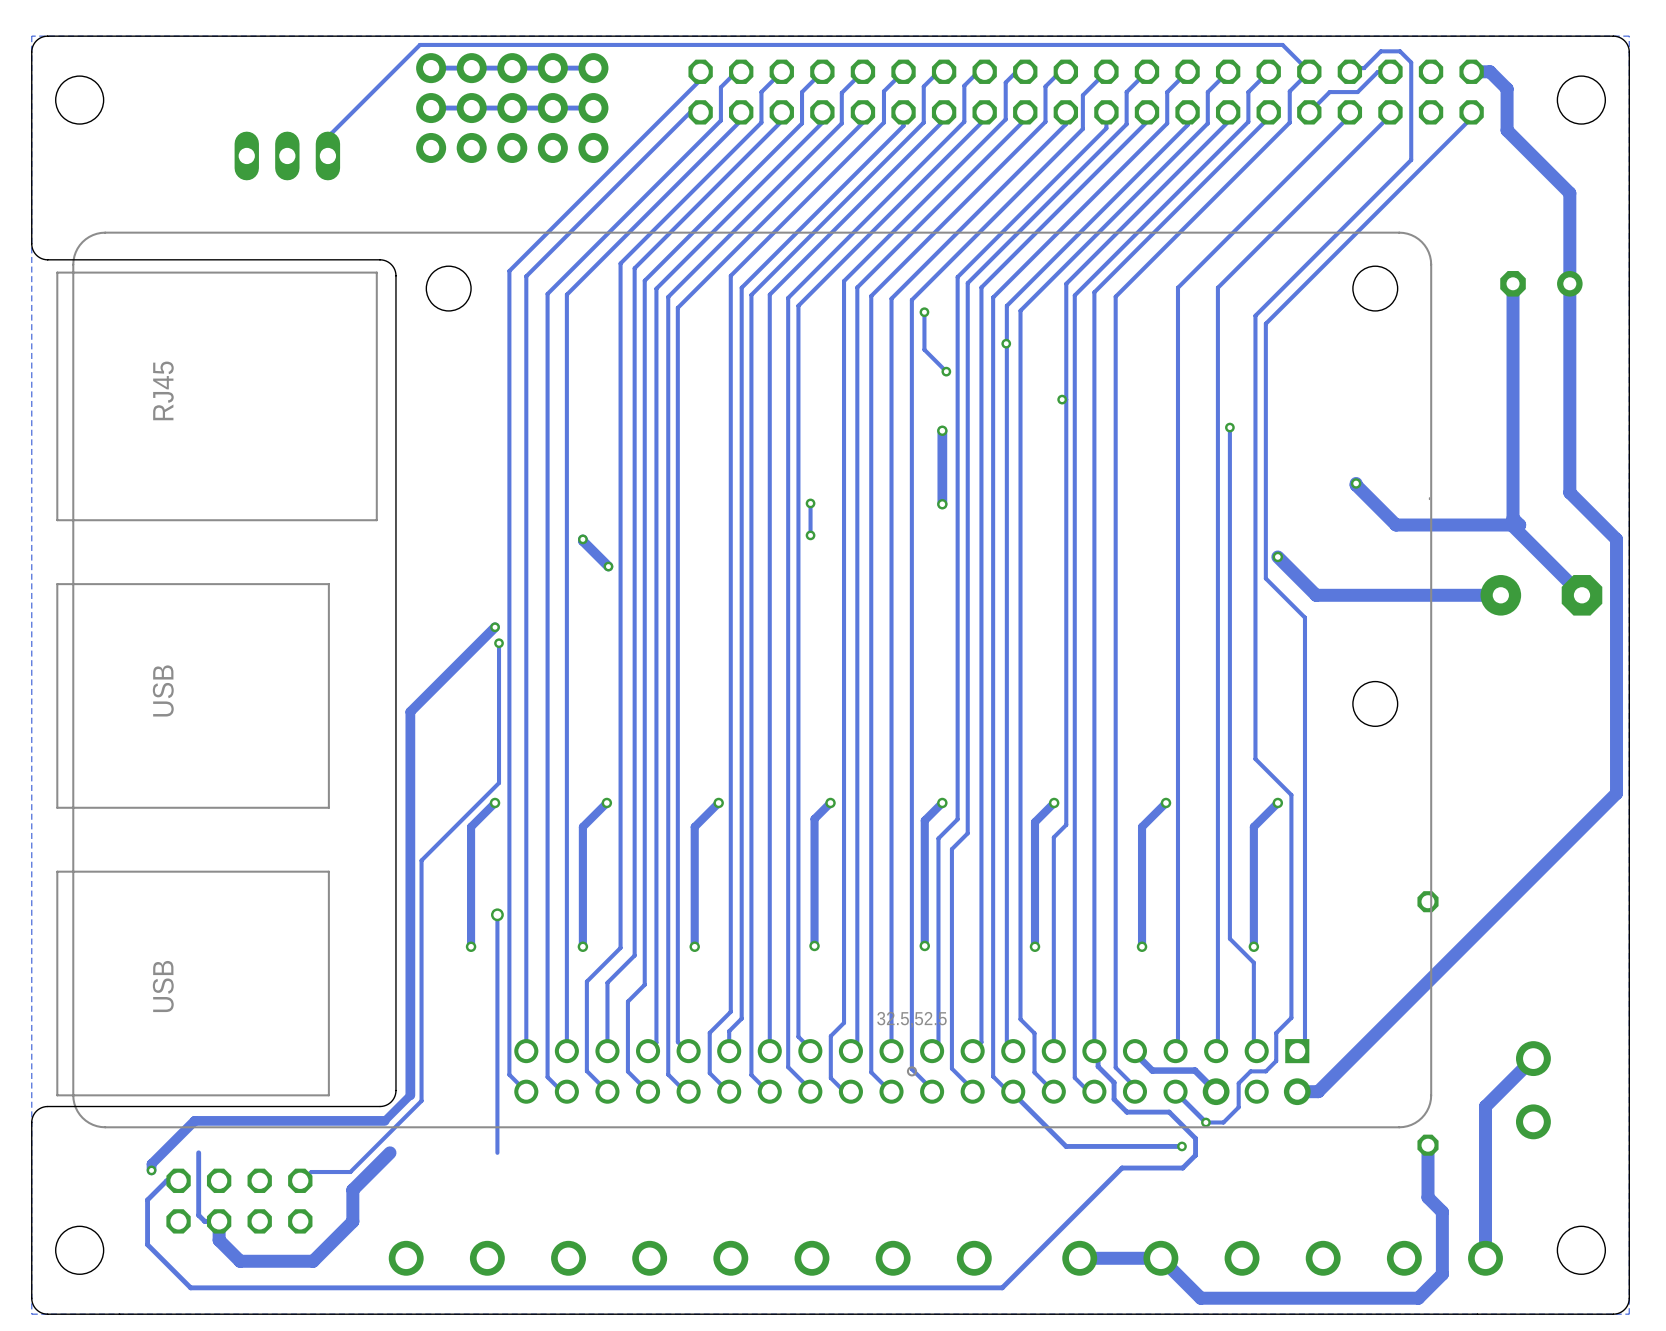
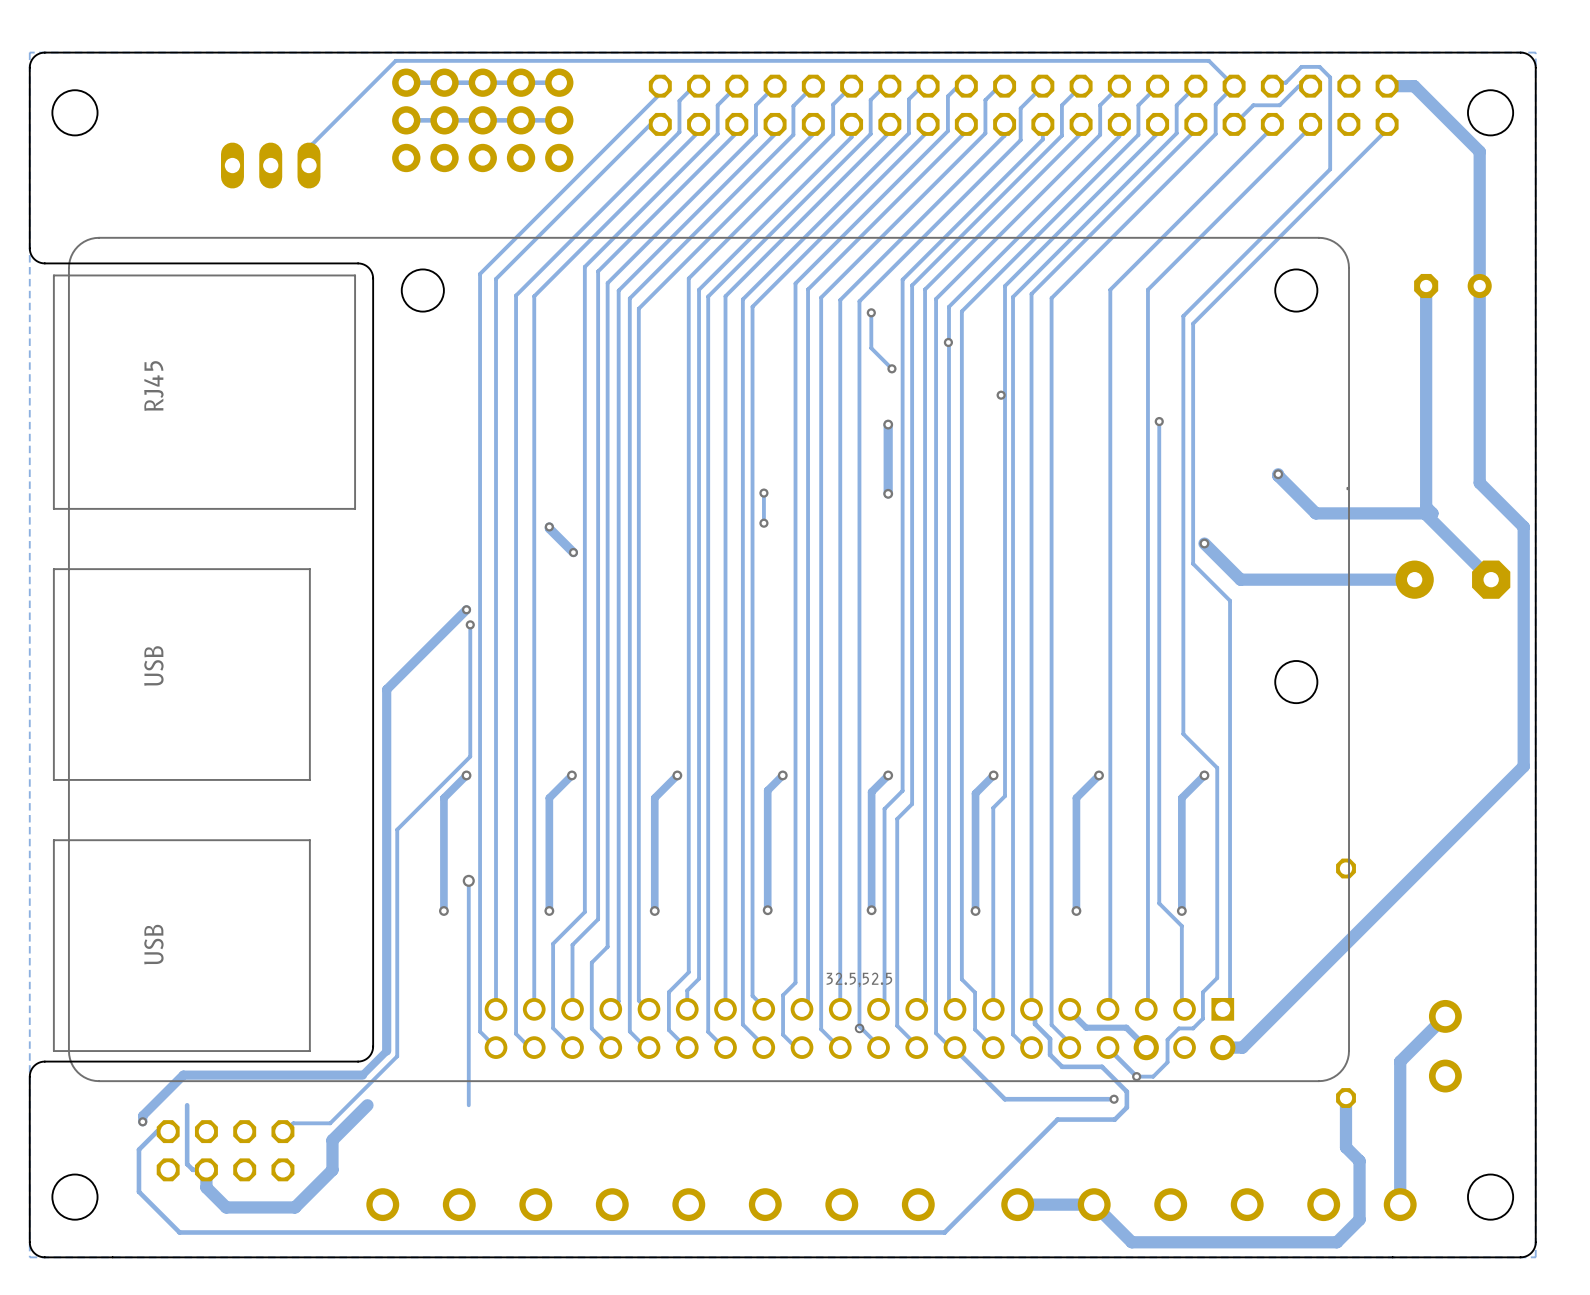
track: (1489, 71) (1507, 88) (1507, 130) (1569, 193) -> (1404, 86) (1414, 86) (1479, 151) (1479, 200)

